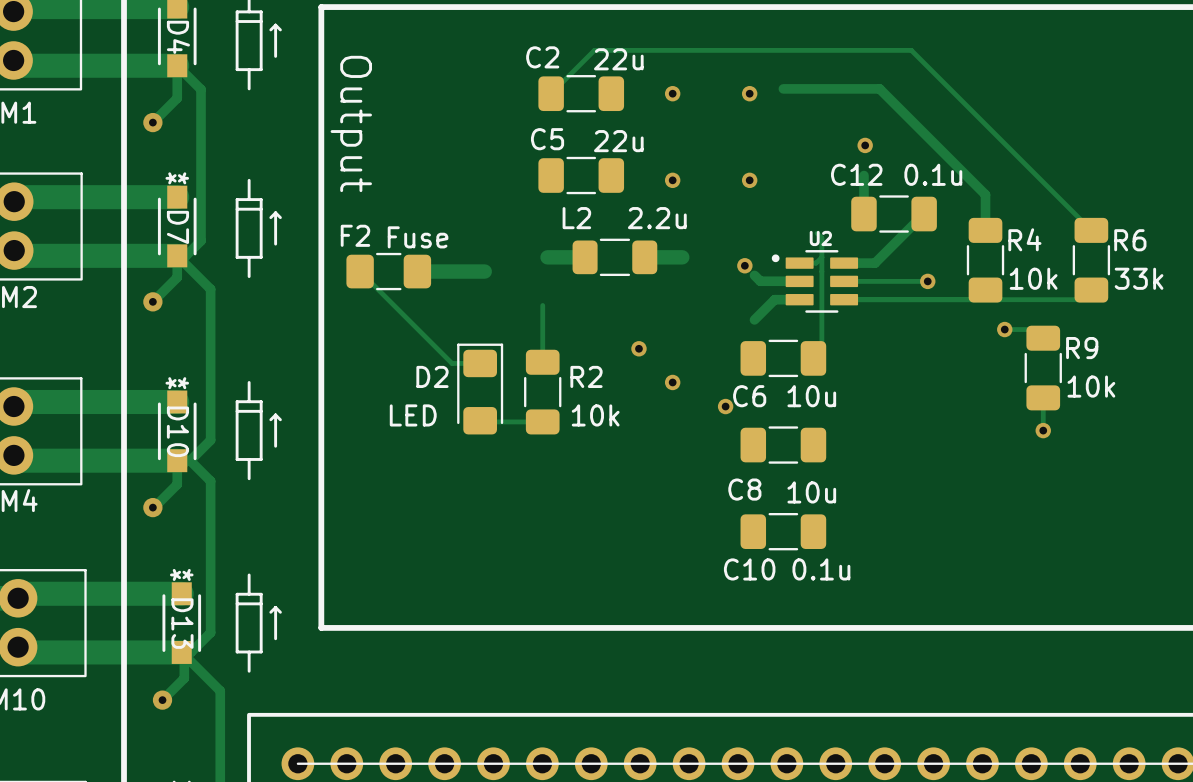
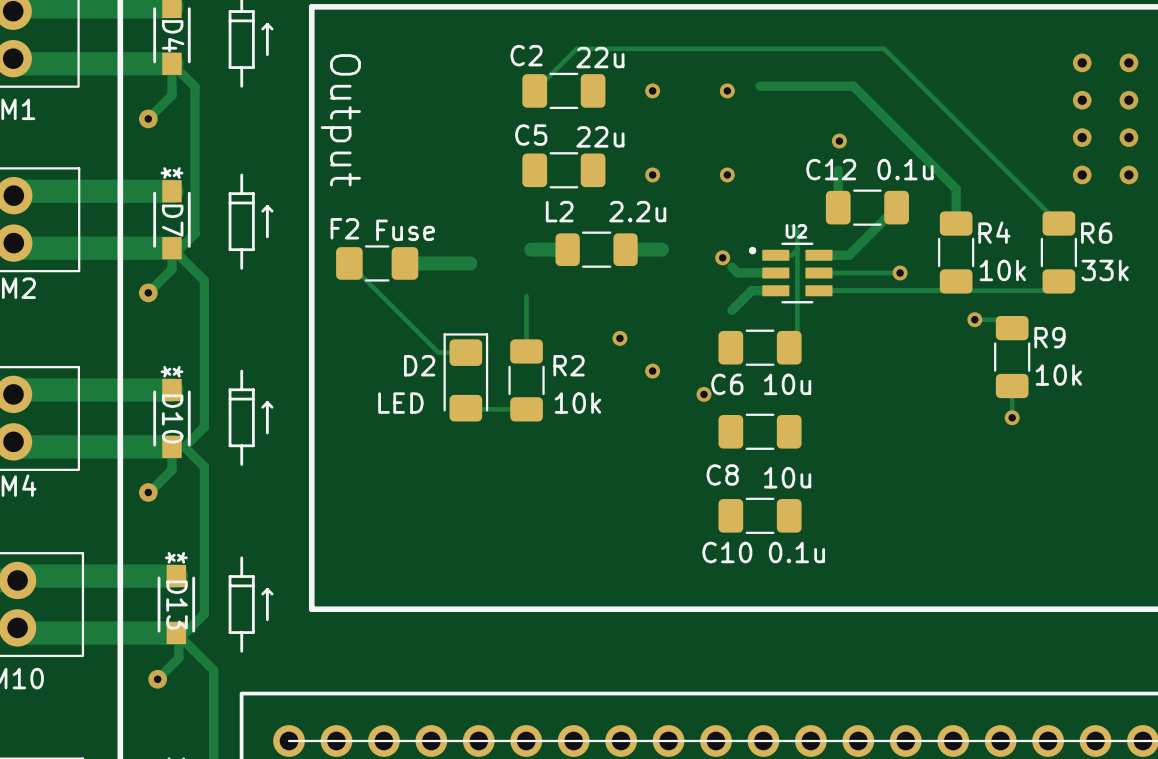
via: none -> (1082, 62)
via: none -> (1128, 62)
via: none -> (1082, 100)
via: none -> (1128, 100)
via: none -> (1082, 137)
via: none -> (1128, 137)
via: none -> (1082, 174)
via: none -> (1128, 174)

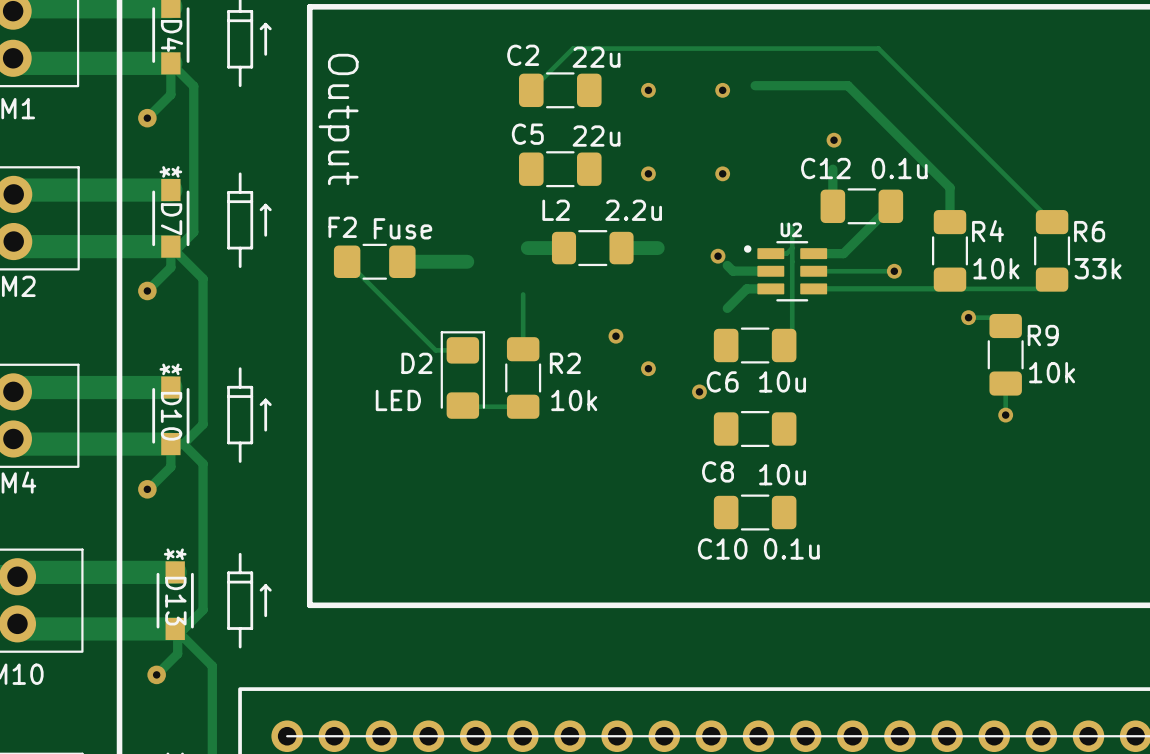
via: (1082, 62) -> none
via: (1128, 62) -> none
via: (1082, 100) -> none
via: (1128, 100) -> none
via: (1082, 137) -> none
via: (1128, 137) -> none
via: (1082, 174) -> none
via: (1128, 174) -> none

